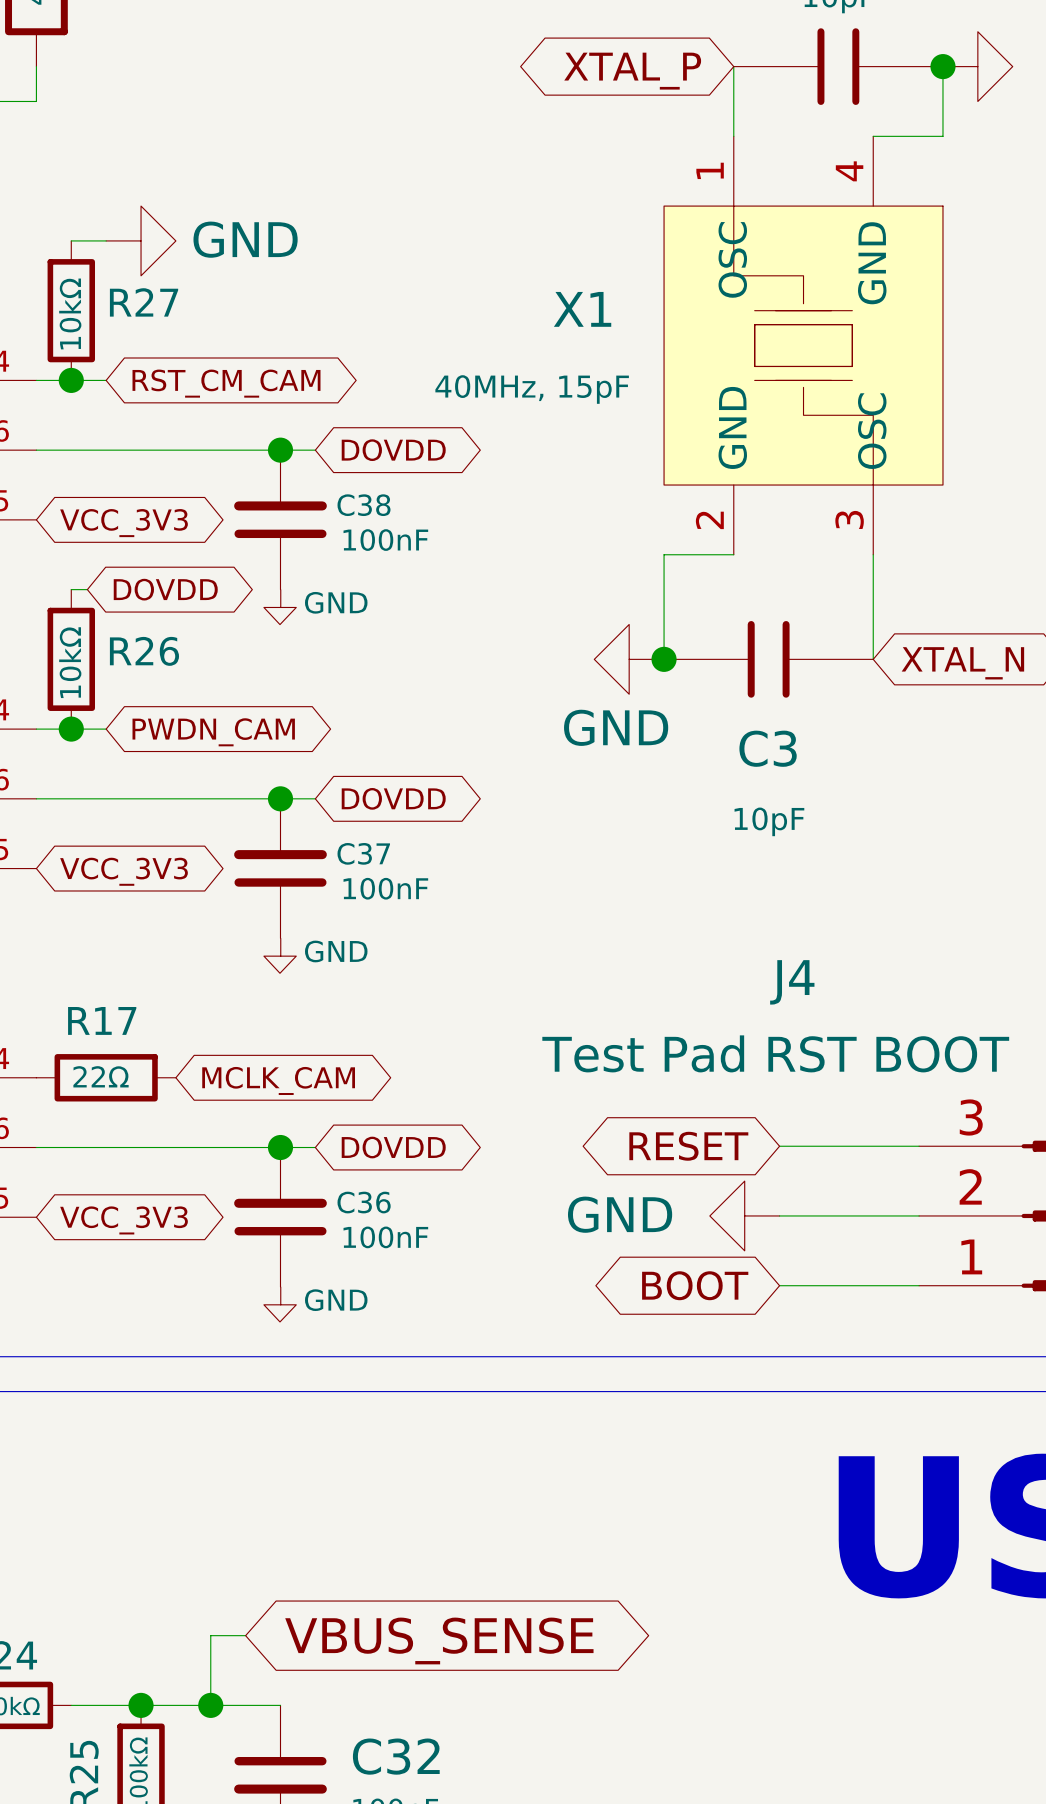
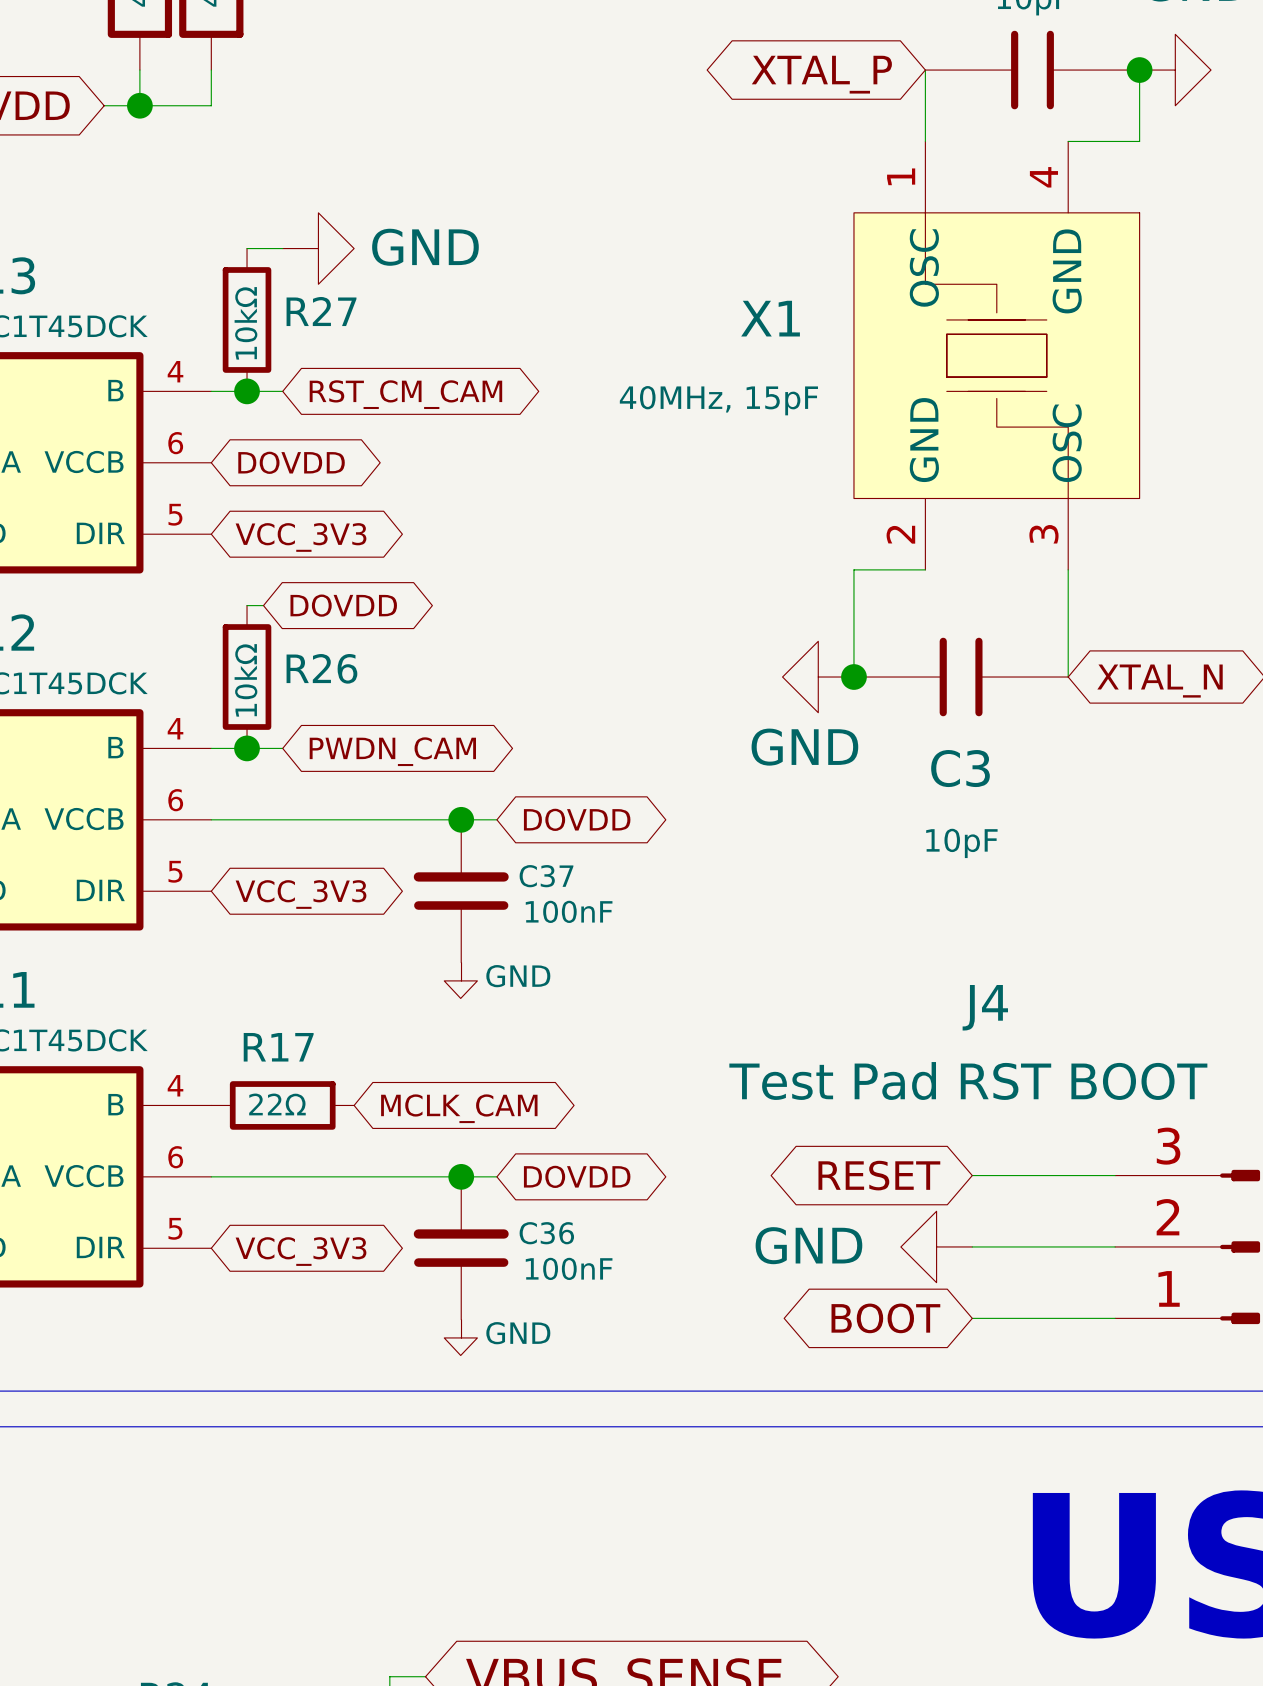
wire: (36, 450) (315, 450) -> none
junction: (280, 450) -> none
global label position: DOVDD (393, 450) -> DOVDD (291, 462)
C38: 100nF (280, 519) -> none
power symbol: GND (280, 607) -> none

